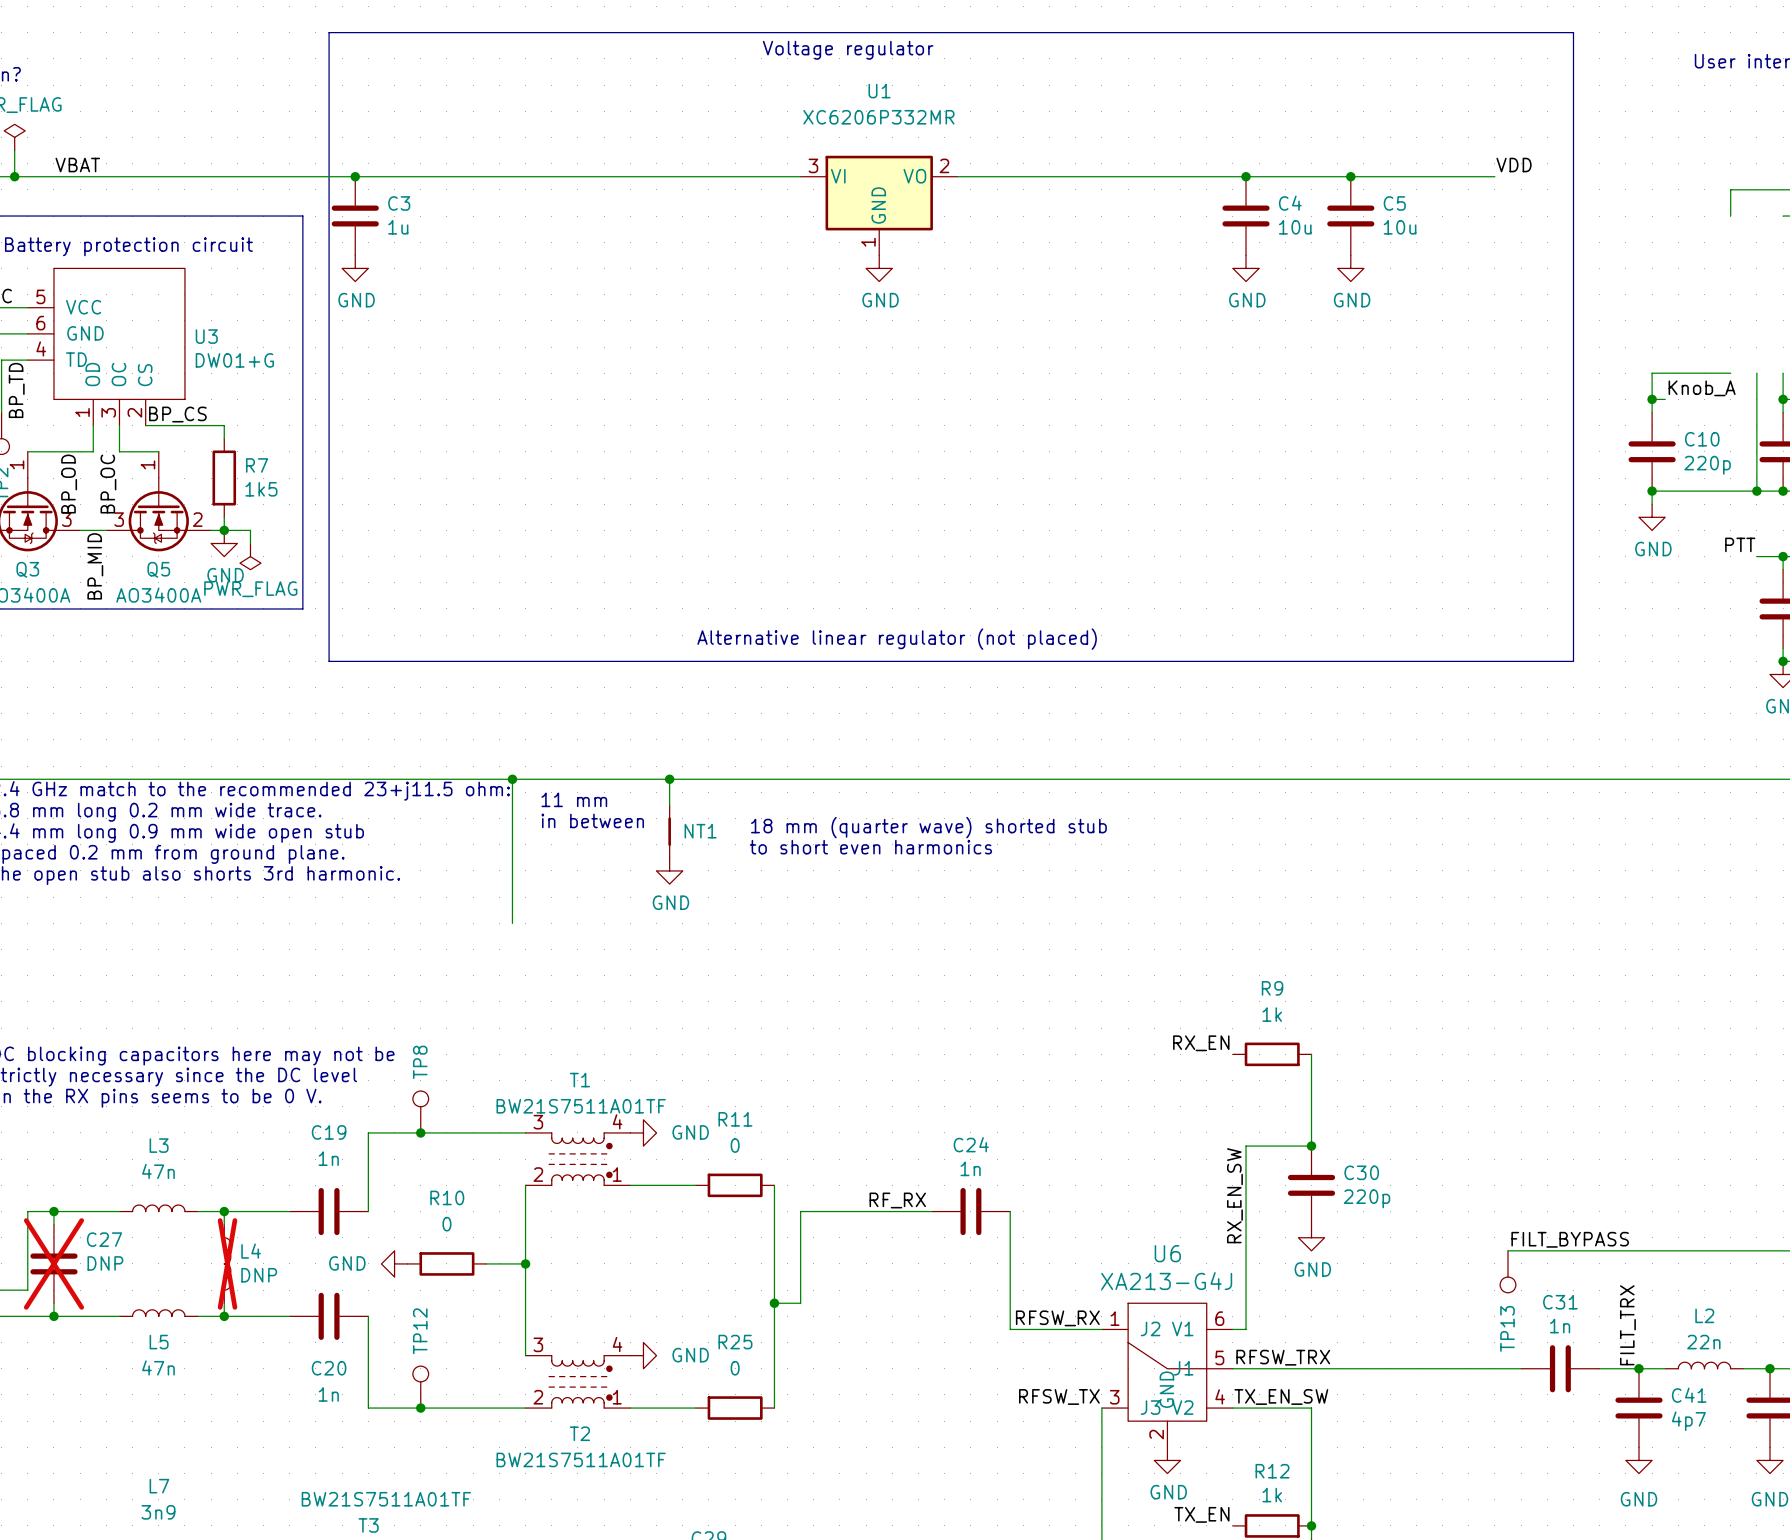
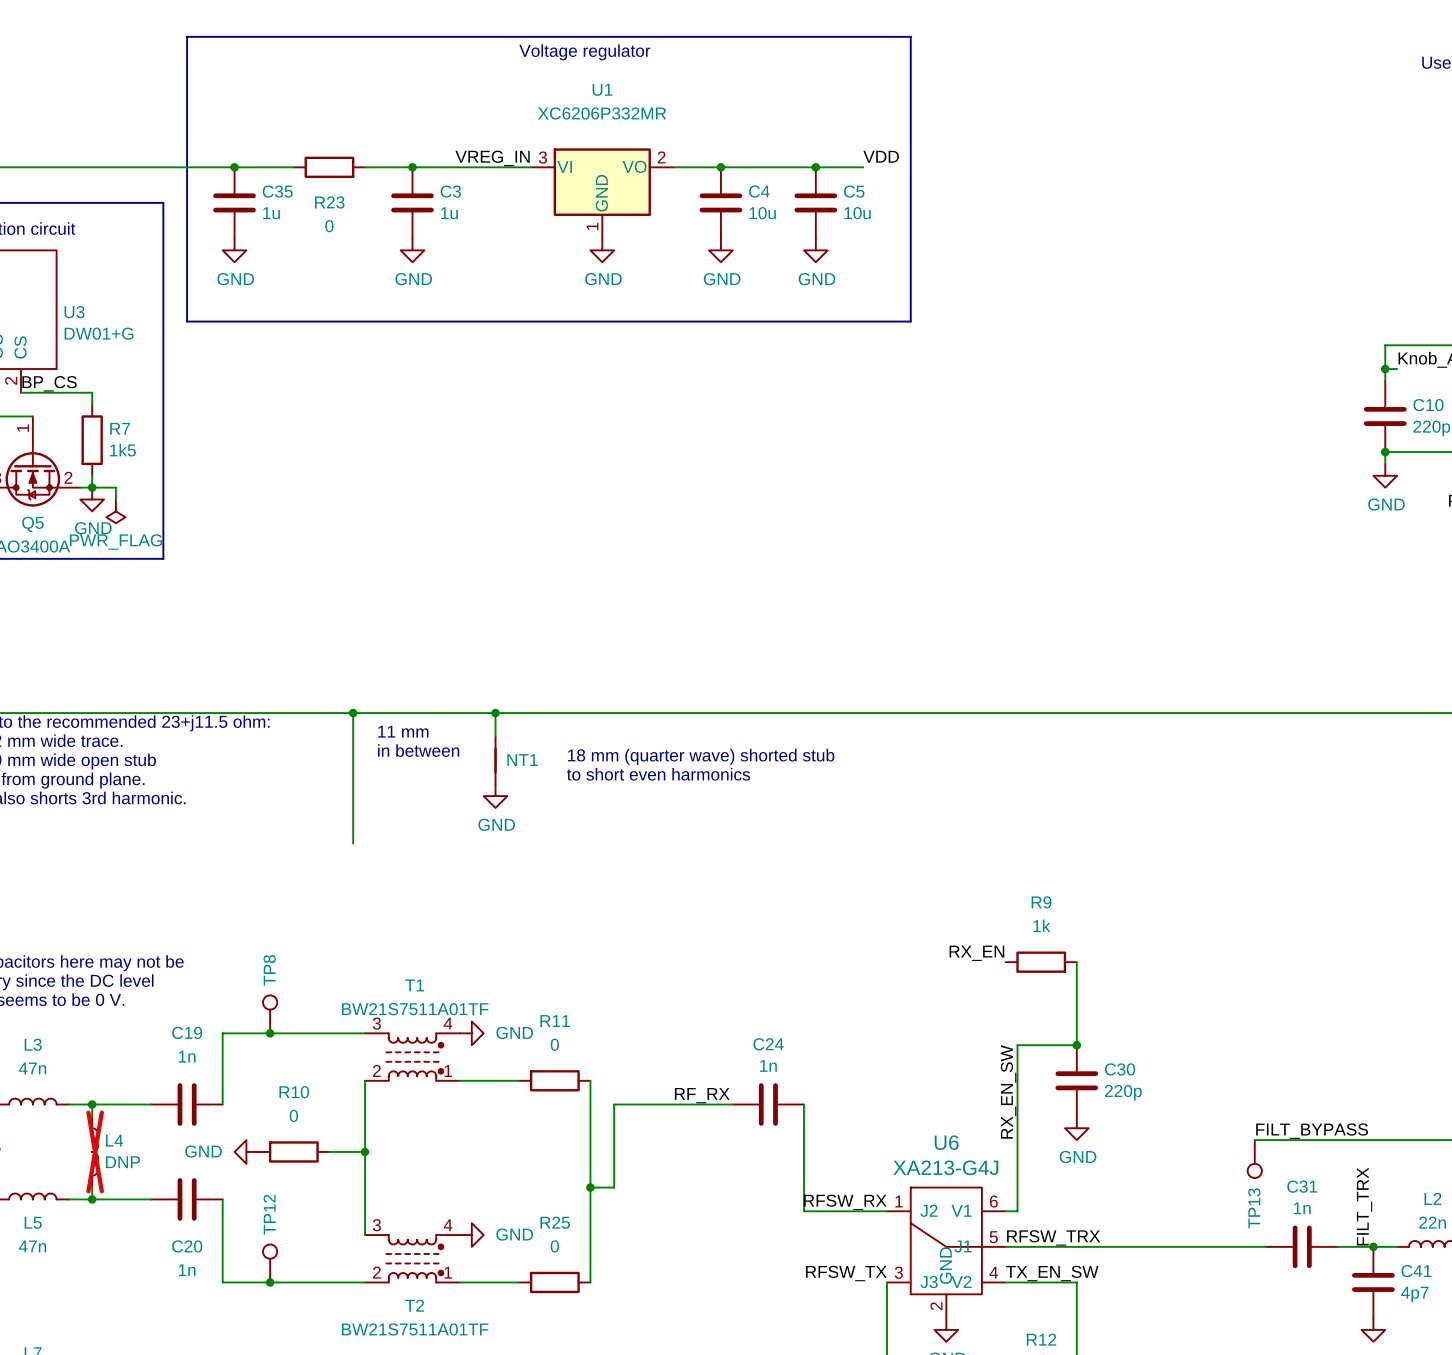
line: (1128, 32) (1573, 32) (1573, 661) (329, 661) (329, 347) -> (910, 36) (910, 321) (187, 321)
text position: Voltage regulator (848, 50) -> Voltage regulator (584, 52)
label: none -> VREG_IN (492, 158)
label: none -> VDD (881, 156)
label: VDD (1514, 165) -> none
junction position: (355, 176) -> (234, 167)
wire: (446, 176) (525, 176) -> none
R23: none -> 0 (329, 167)
junction: none -> (412, 167)
junction: none -> (720, 167)
junction: none -> (815, 167)
wire: (1075, 176) (1494, 176) -> none
junction: (1246, 176) -> none
junction: (1350, 176) -> none
U1 position: (879, 205) -> (602, 193)
C3 position: (355, 216) -> (412, 202)
C35: none -> 1u (234, 202)
C4 position: (1246, 216) -> (720, 202)
C5 position: (1350, 216) -> (815, 202)
power symbol position: GND (355, 268) -> GND (234, 250)
power symbol: none -> GND (412, 250)
power symbol: none -> GND (602, 250)
power symbol position: GND (879, 268) -> GND (720, 250)
power symbol: none -> GND (815, 250)
power symbol: GND (1246, 268) -> none
power symbol: GND (1350, 268) -> none
text: Alternative linear regulator (not placed) (897, 639) -> none

